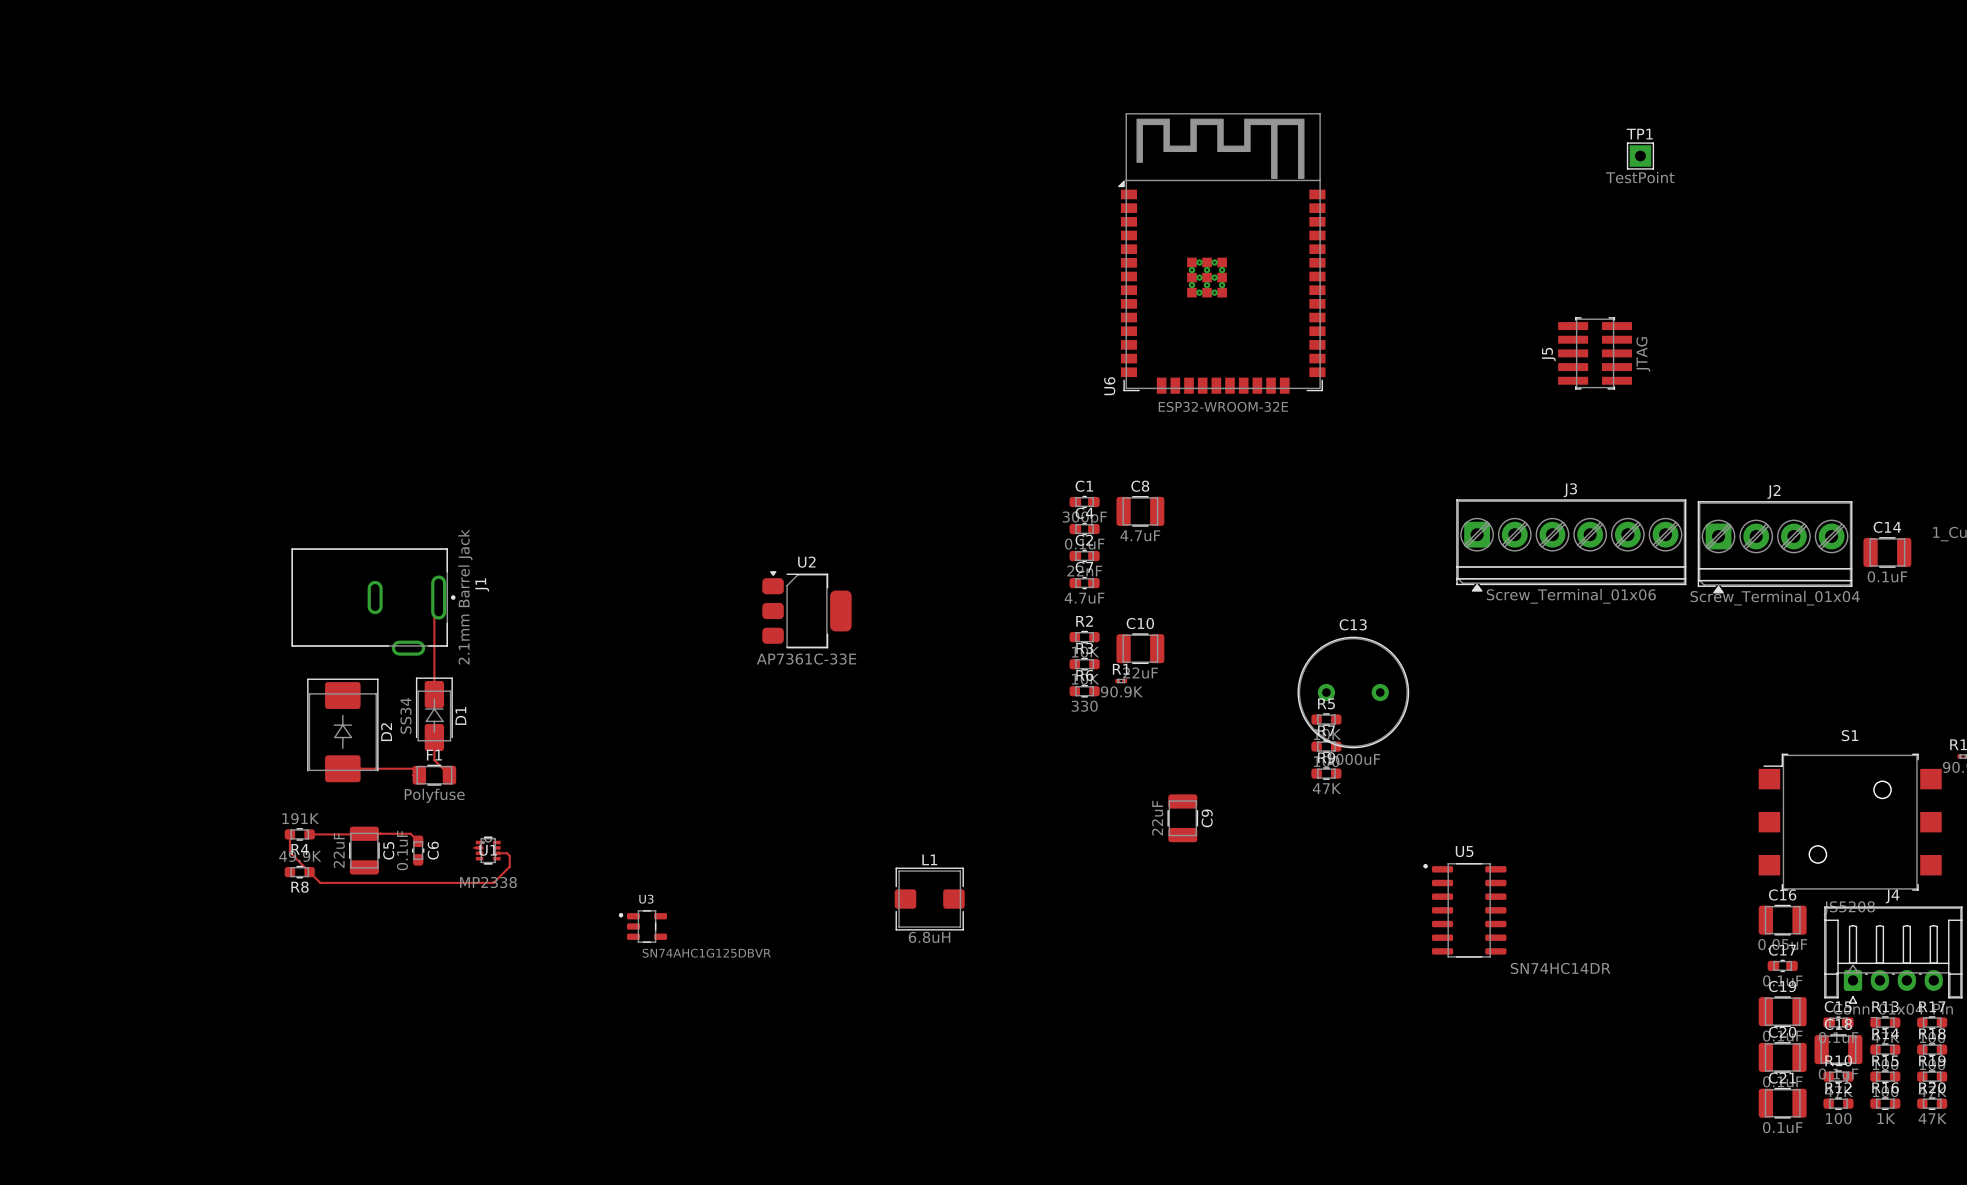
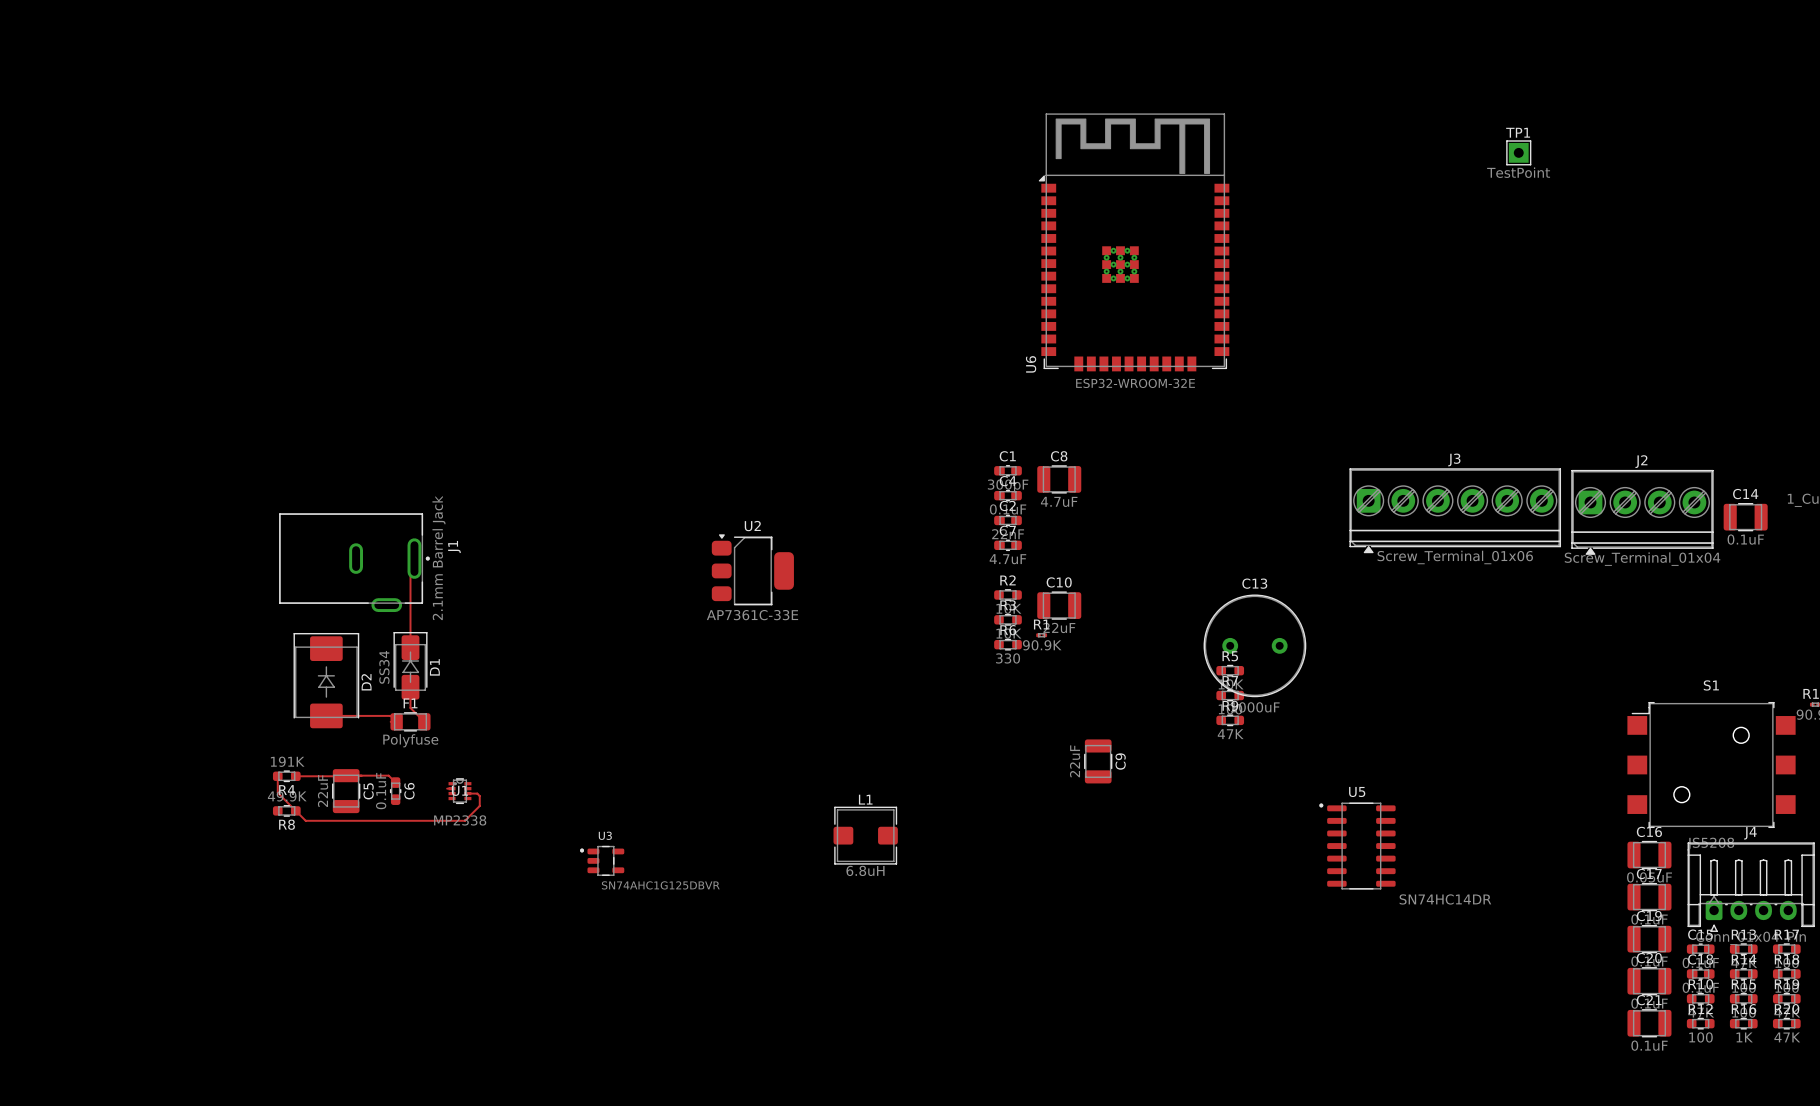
J5: JTAG (1595, 353) -> none
C17 footprint: [1767, 959, 1798, 973] -> [1627, 883, 1672, 912]
C18 footprint: [1814, 1034, 1863, 1065] -> [1686, 968, 1715, 980]

